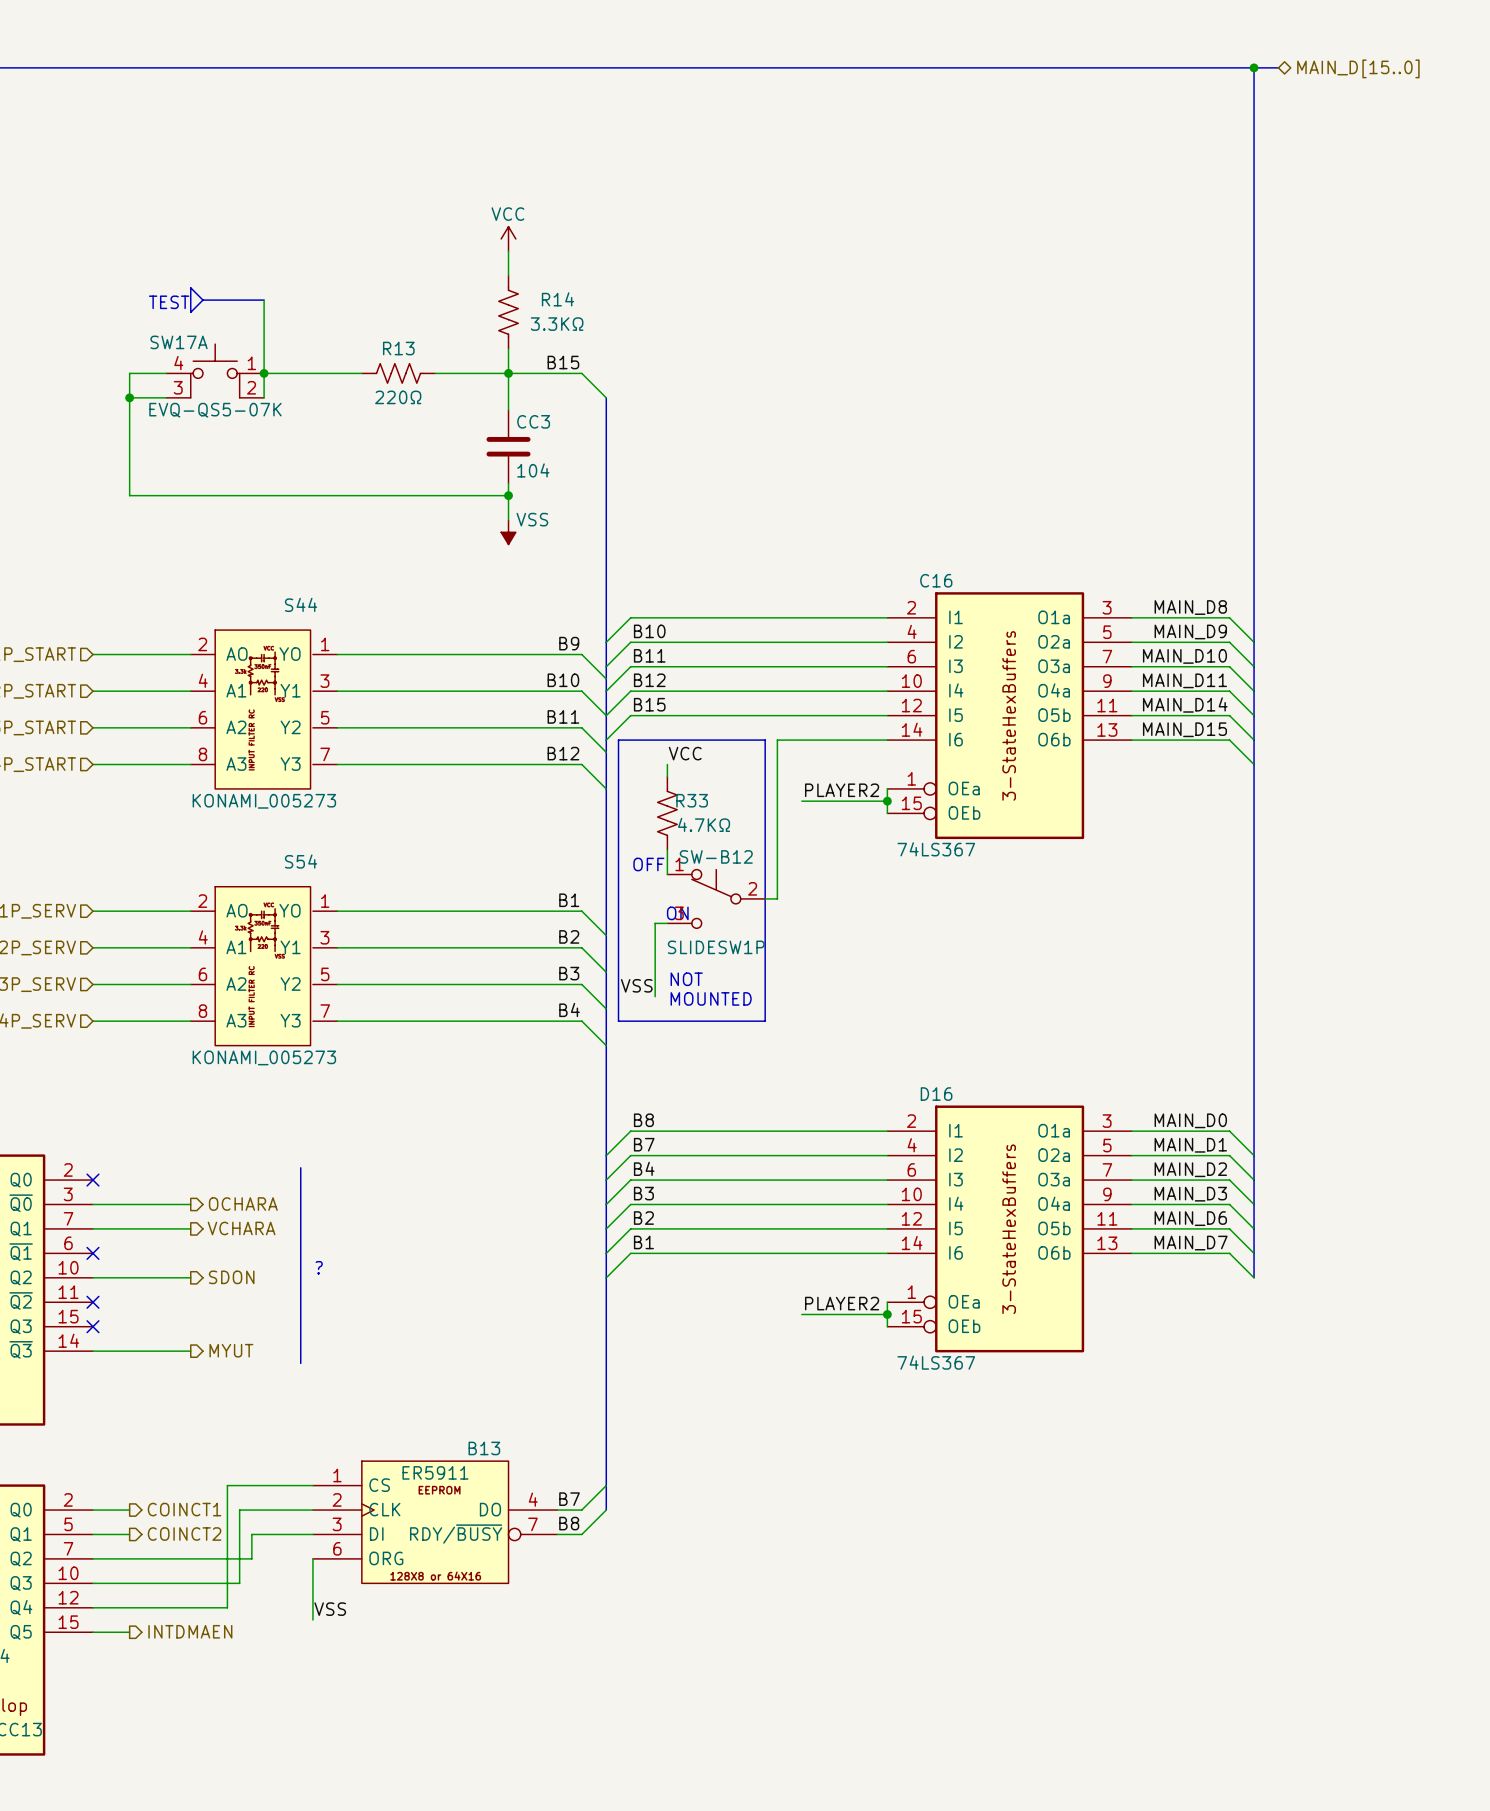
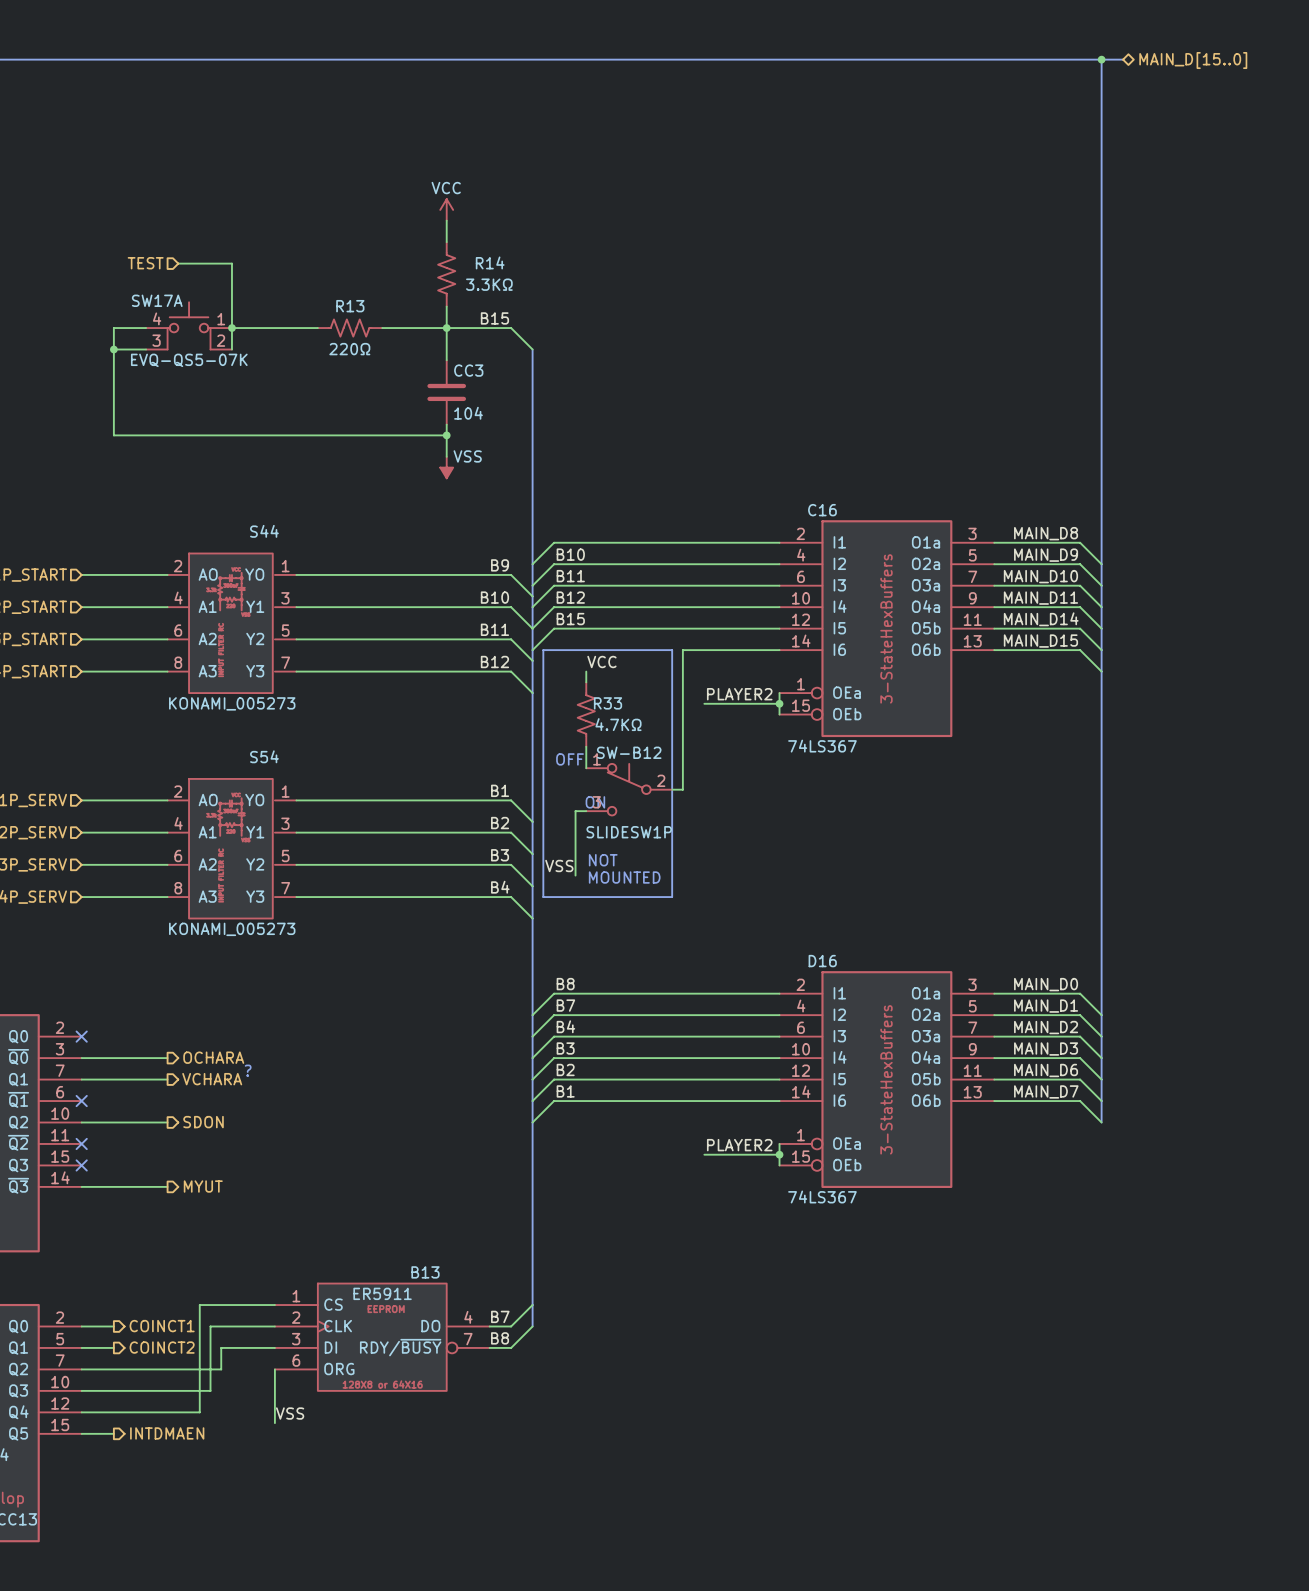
hierarchical label: none -> TEST (145, 263)
line: (202, 300) (264, 300) -> none
line: (202, 300) (190, 287) (190, 312) (202, 300) -> none
text: TEST (169, 302) -> none
line: (300, 1167) (300, 1363) -> none
text position: ? (319, 1267) -> ? (248, 1070)

